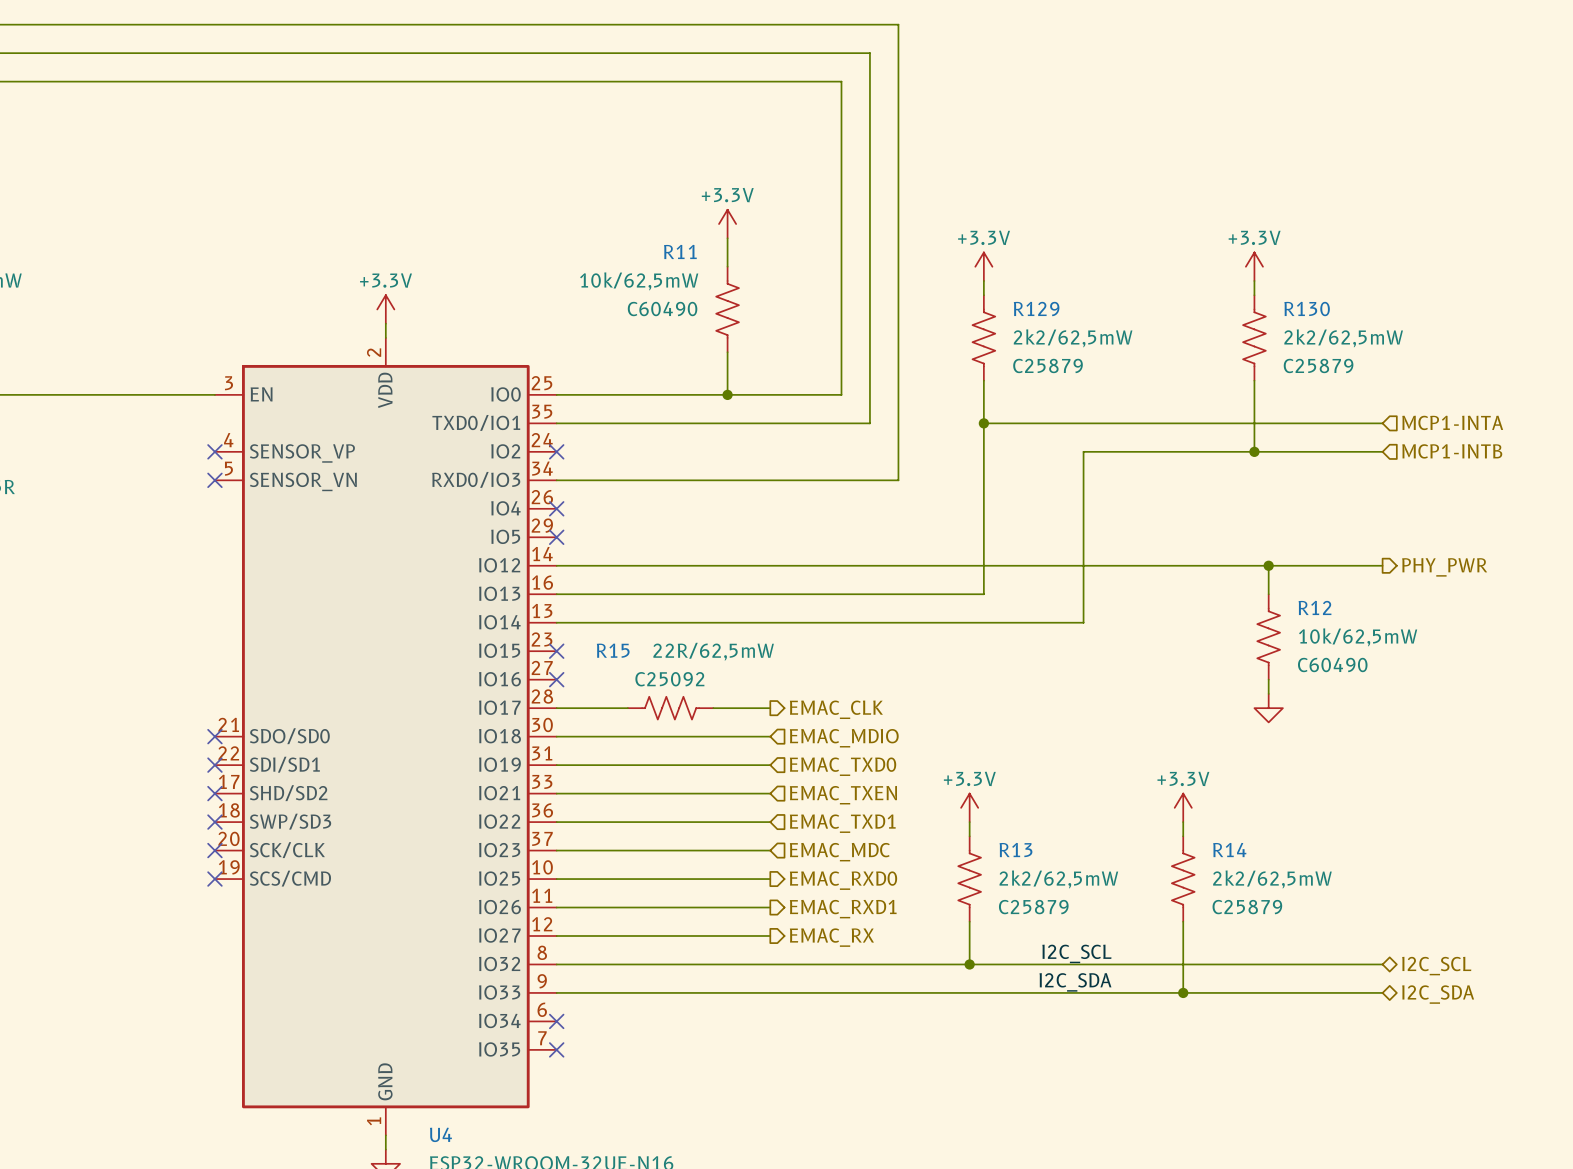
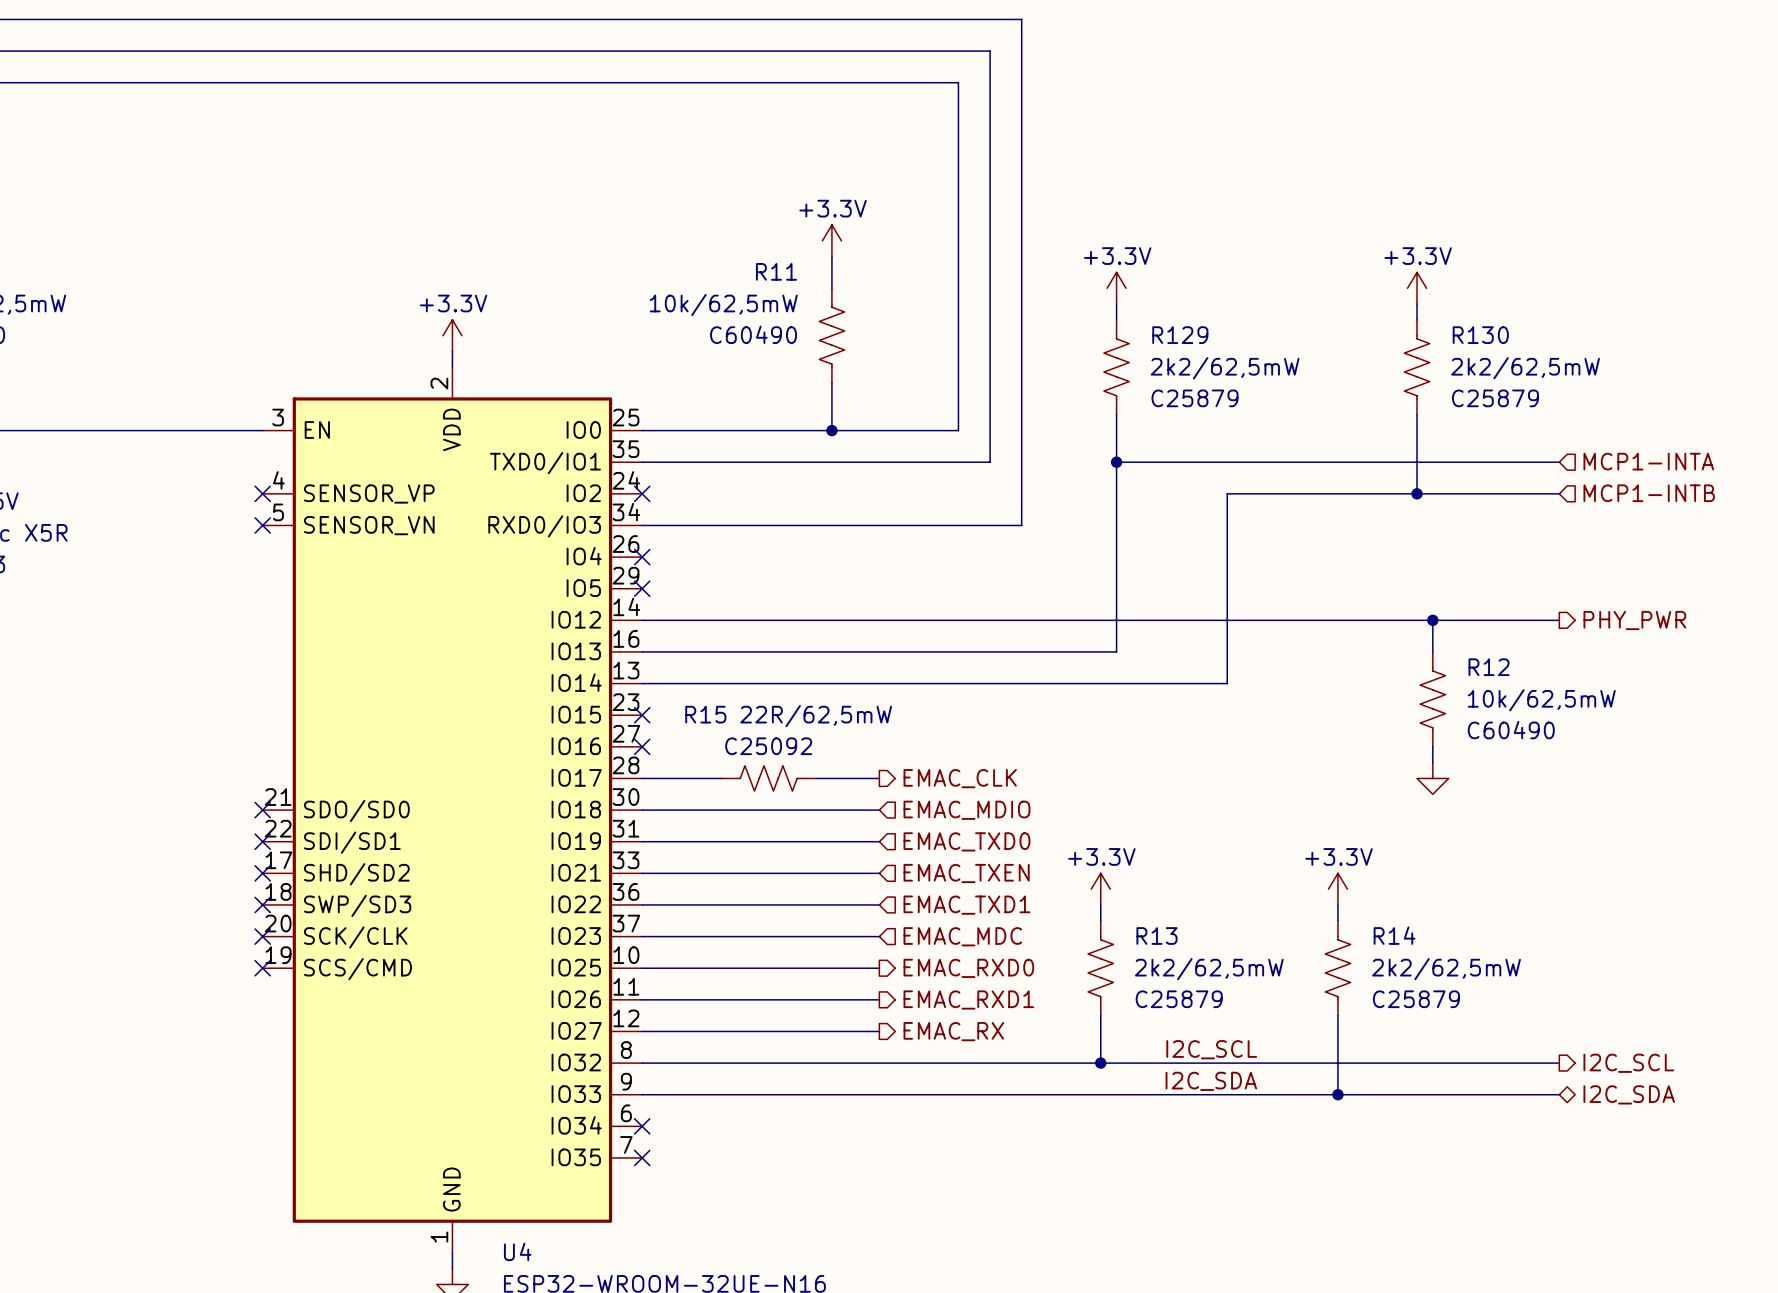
hierarchical label shape: bidirectional (1436, 966) -> output (1628, 1063)

